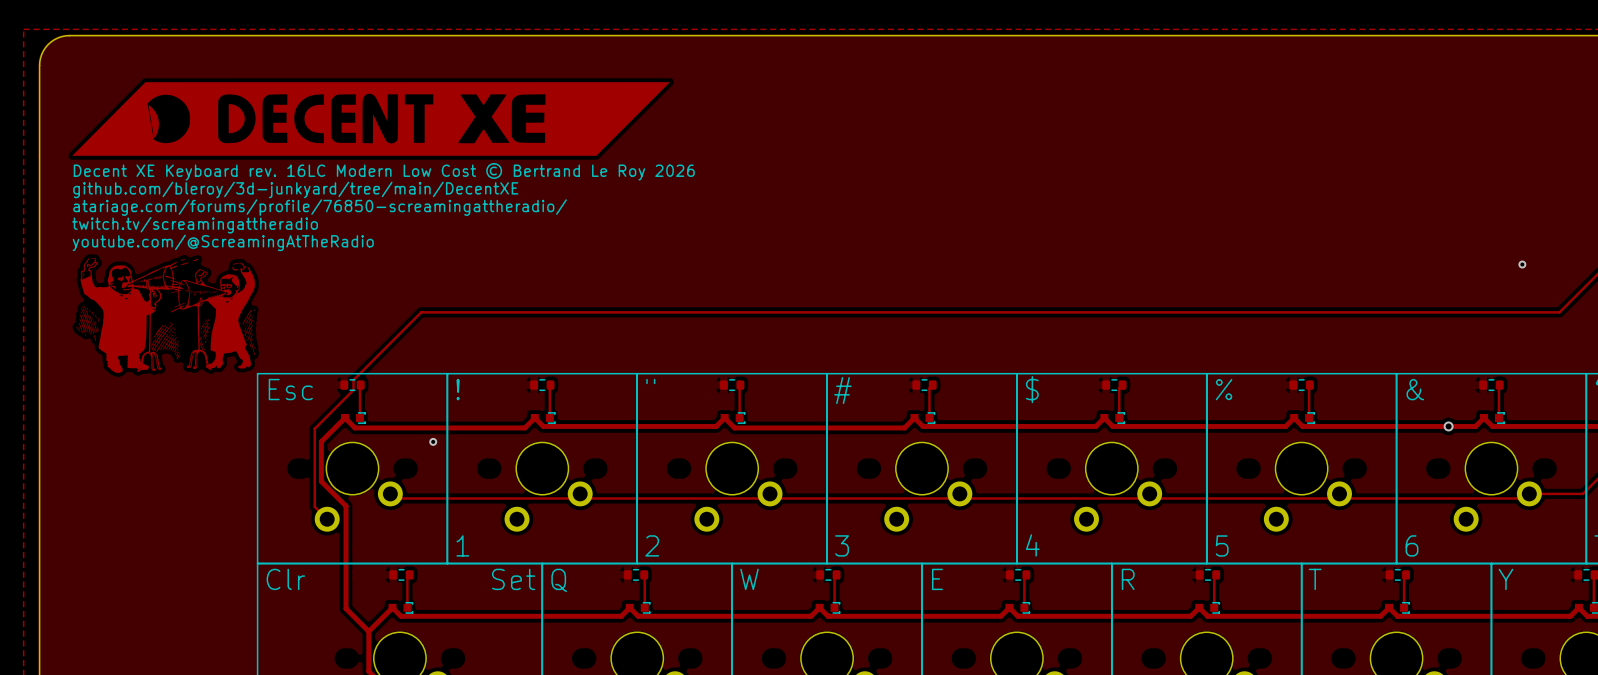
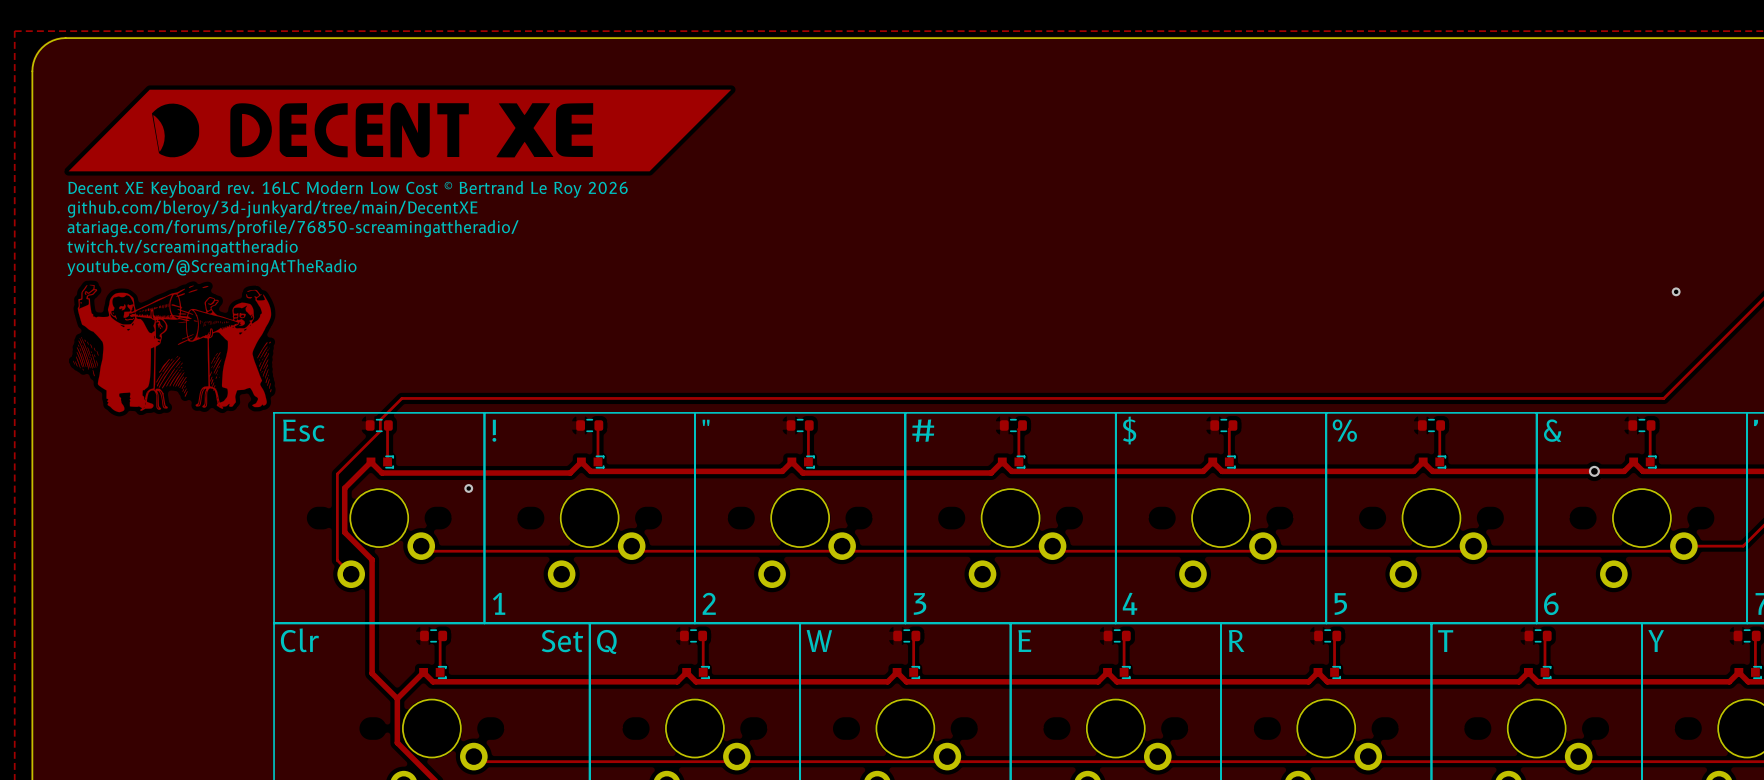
track: (1559, 312) (421, 312) (372, 360) -> (1717, 344) (1663, 398) (401, 398)

